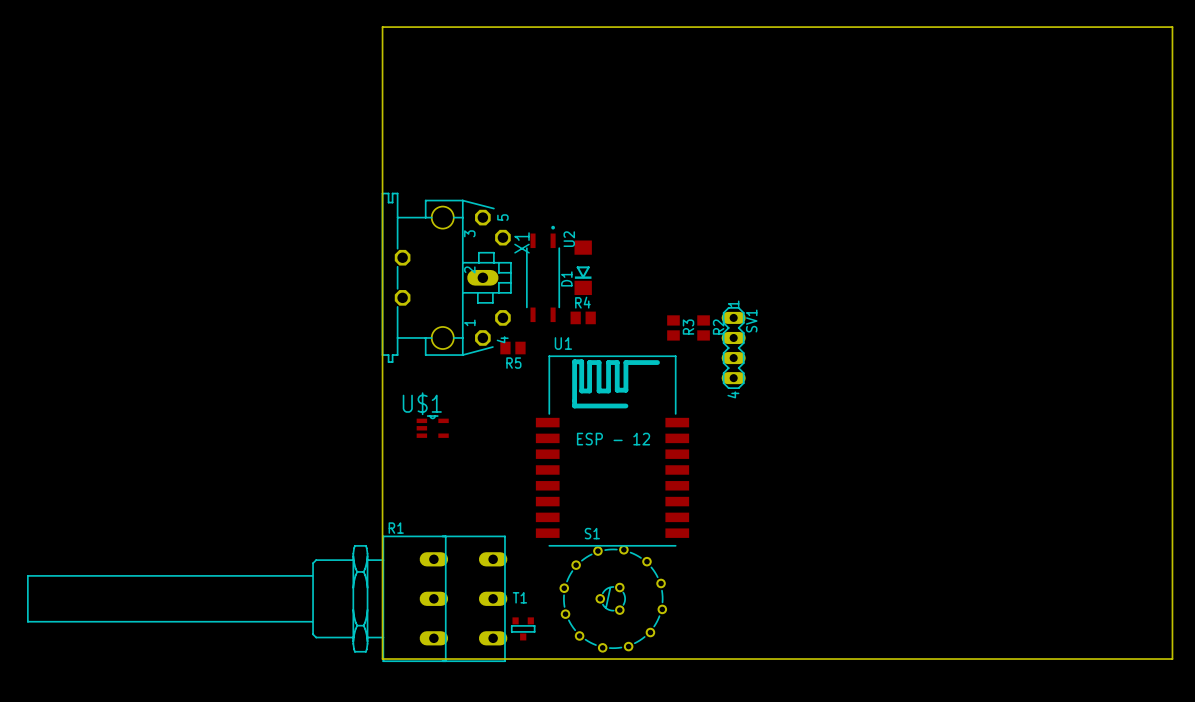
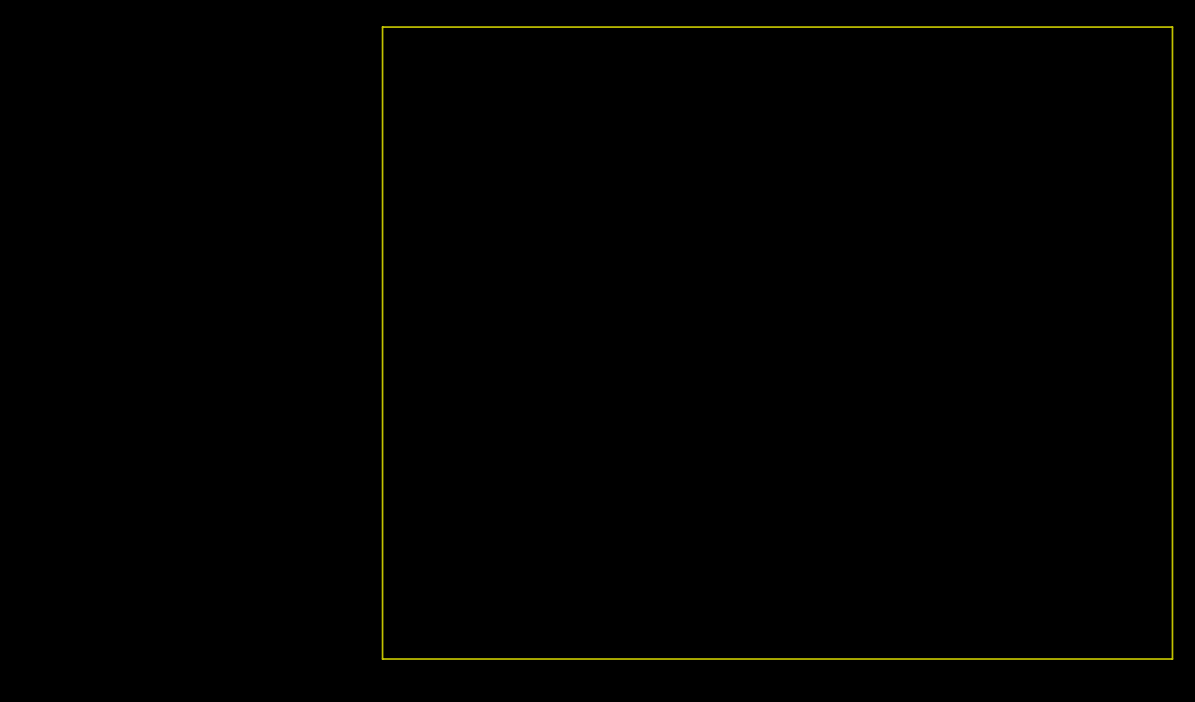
D1: (583, 267) -> none
U2: (543, 274) -> none
X1: (446, 277) -> none
R4: (583, 317) -> none
R3: (673, 327) -> none
R2: (703, 327) -> none
R5: (512, 348) -> none
SV1: (733, 348) -> none
U$1: (432, 426) -> none
U1: (612, 451) -> none
R1: (267, 598) -> none
S1: (613, 598) -> none
T1: (523, 628) -> none

